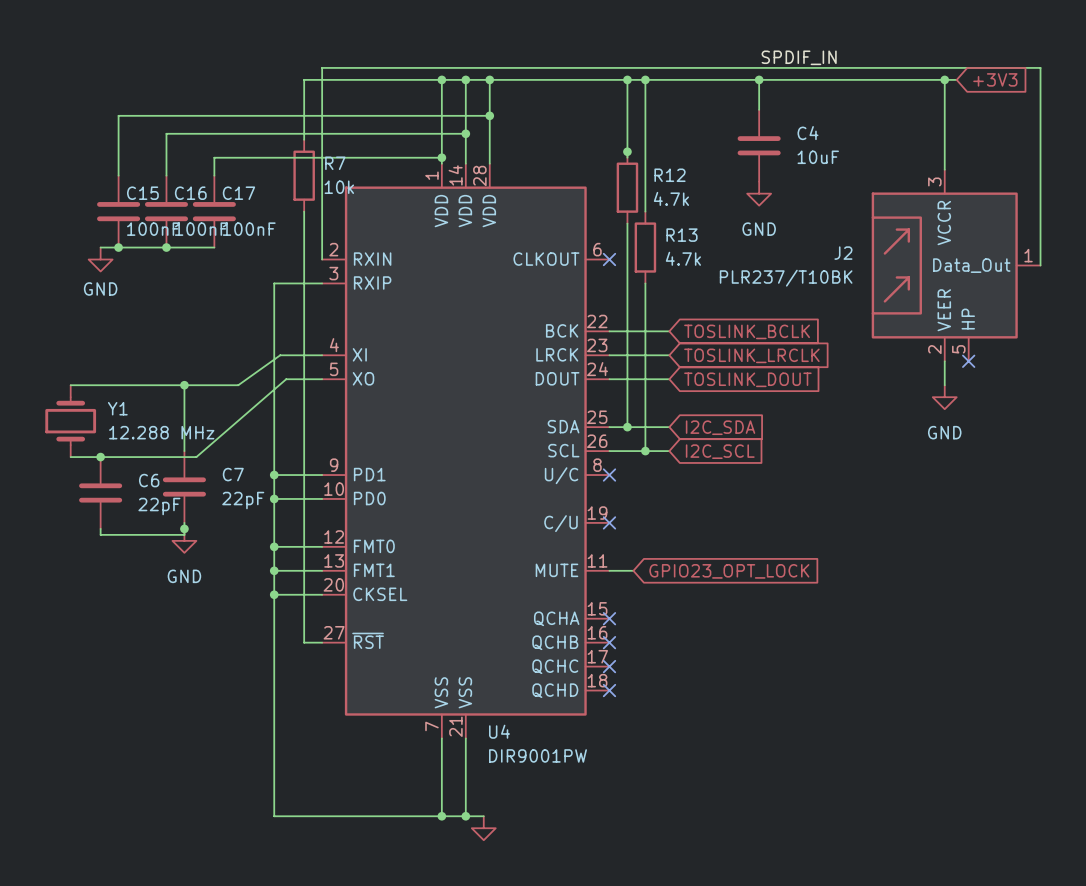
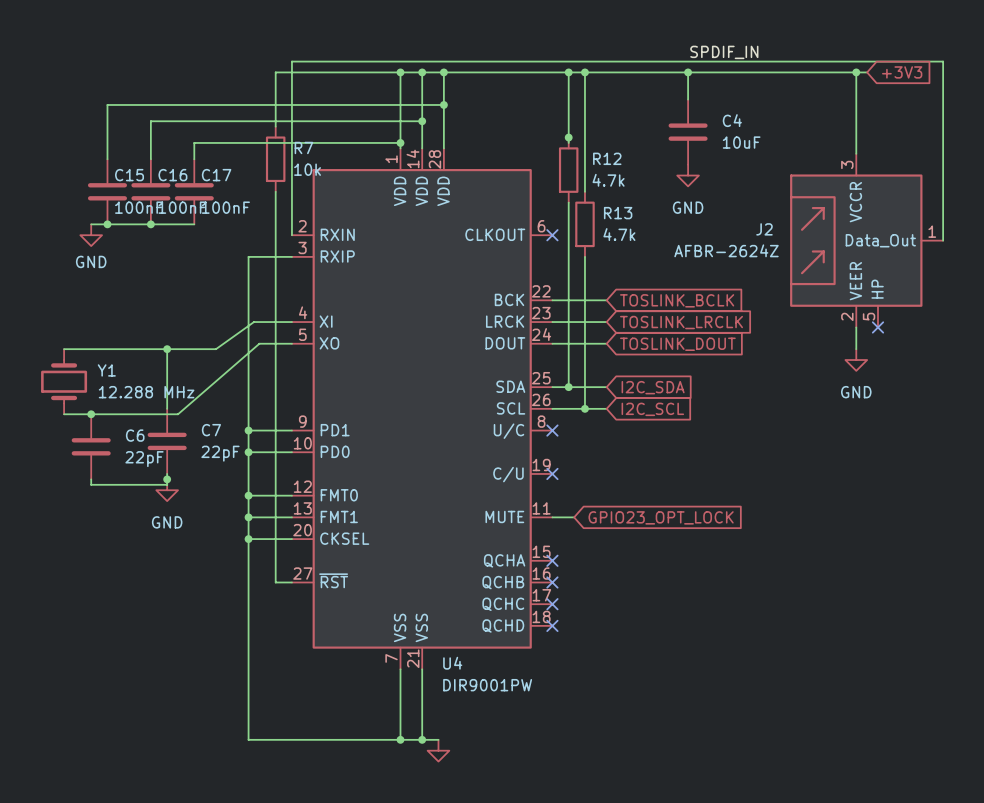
J2 value: PLR237/T10BK (786, 278) -> AFBR-2624Z (726, 250)

